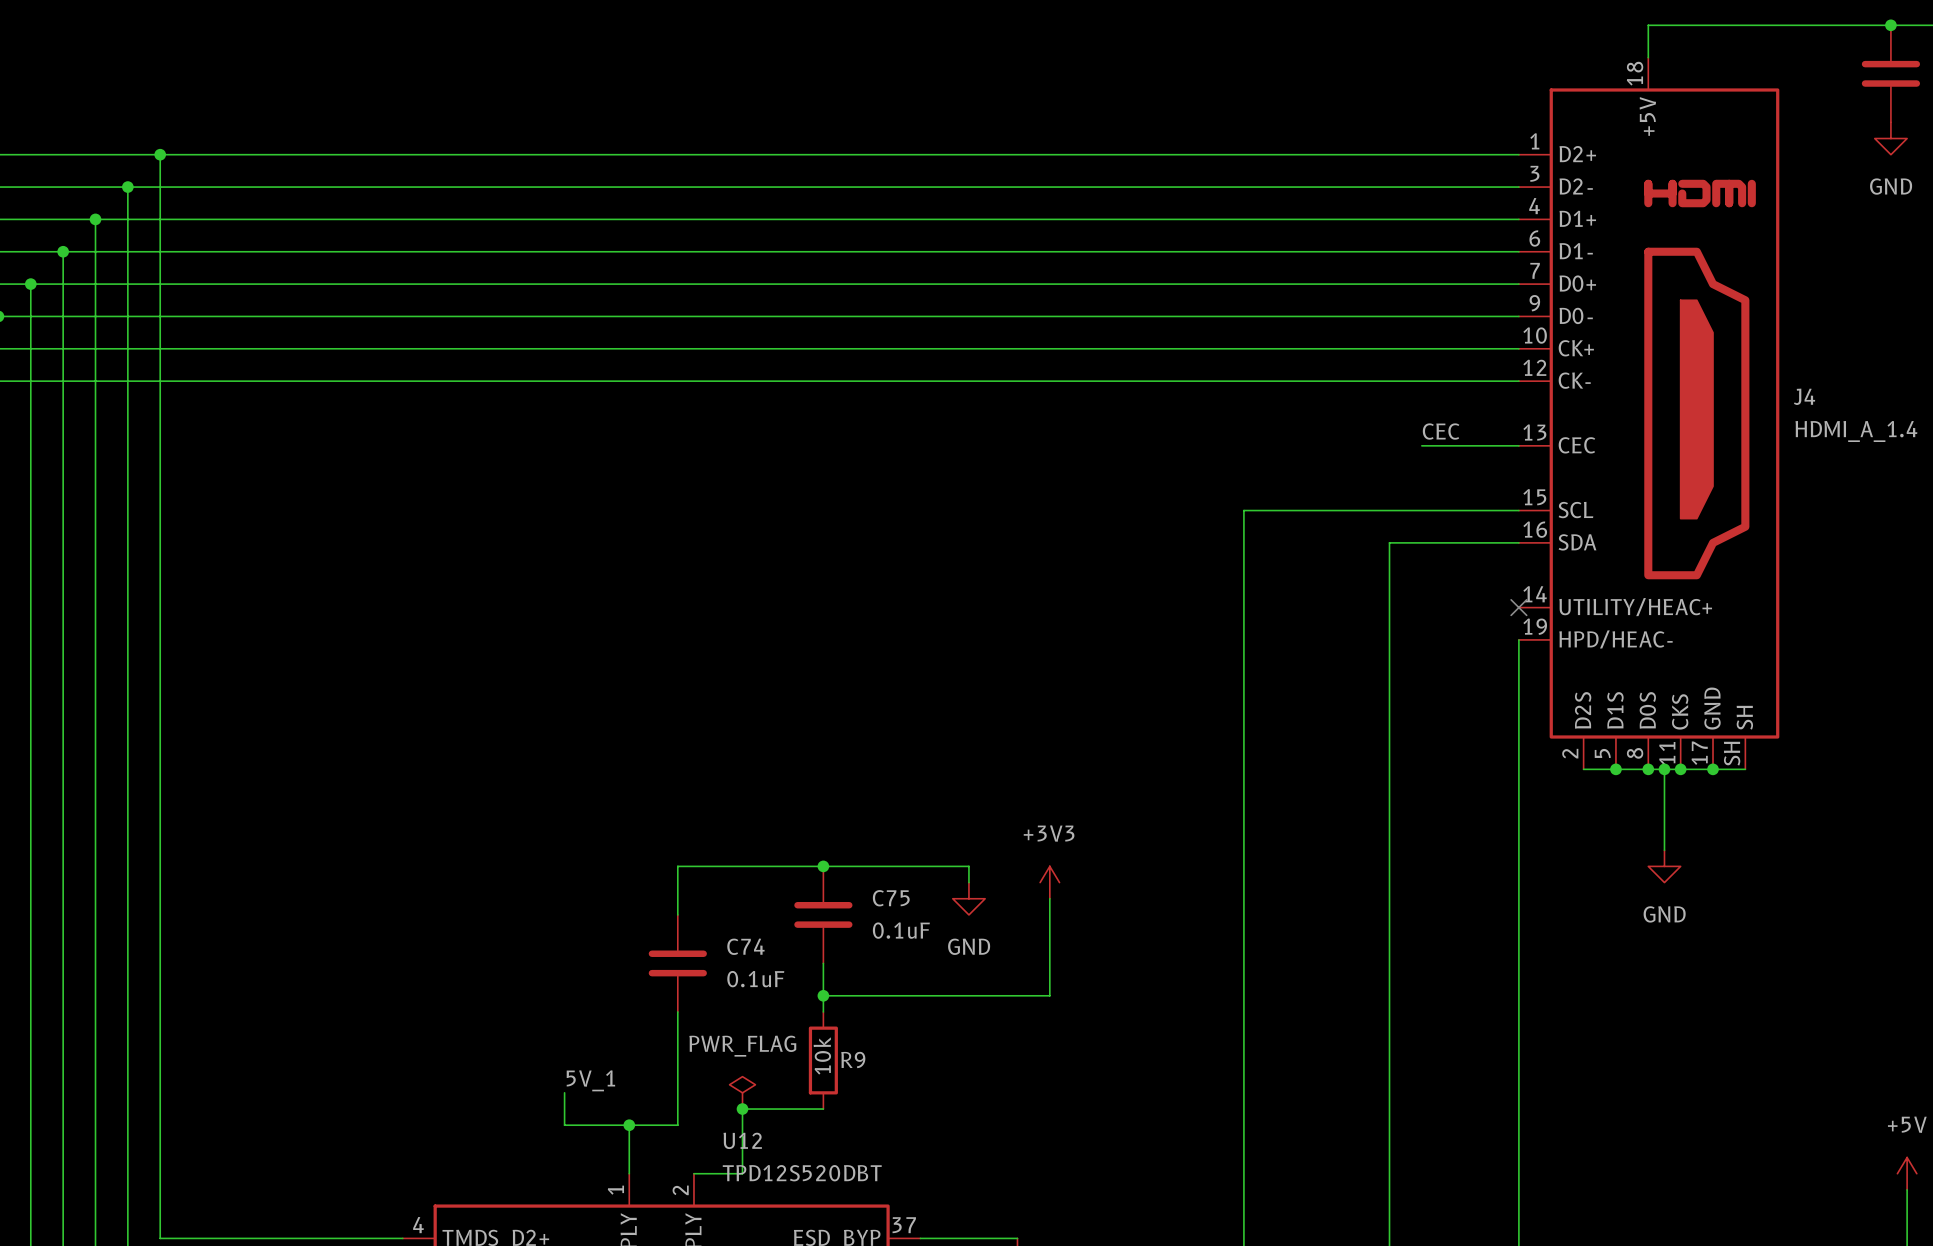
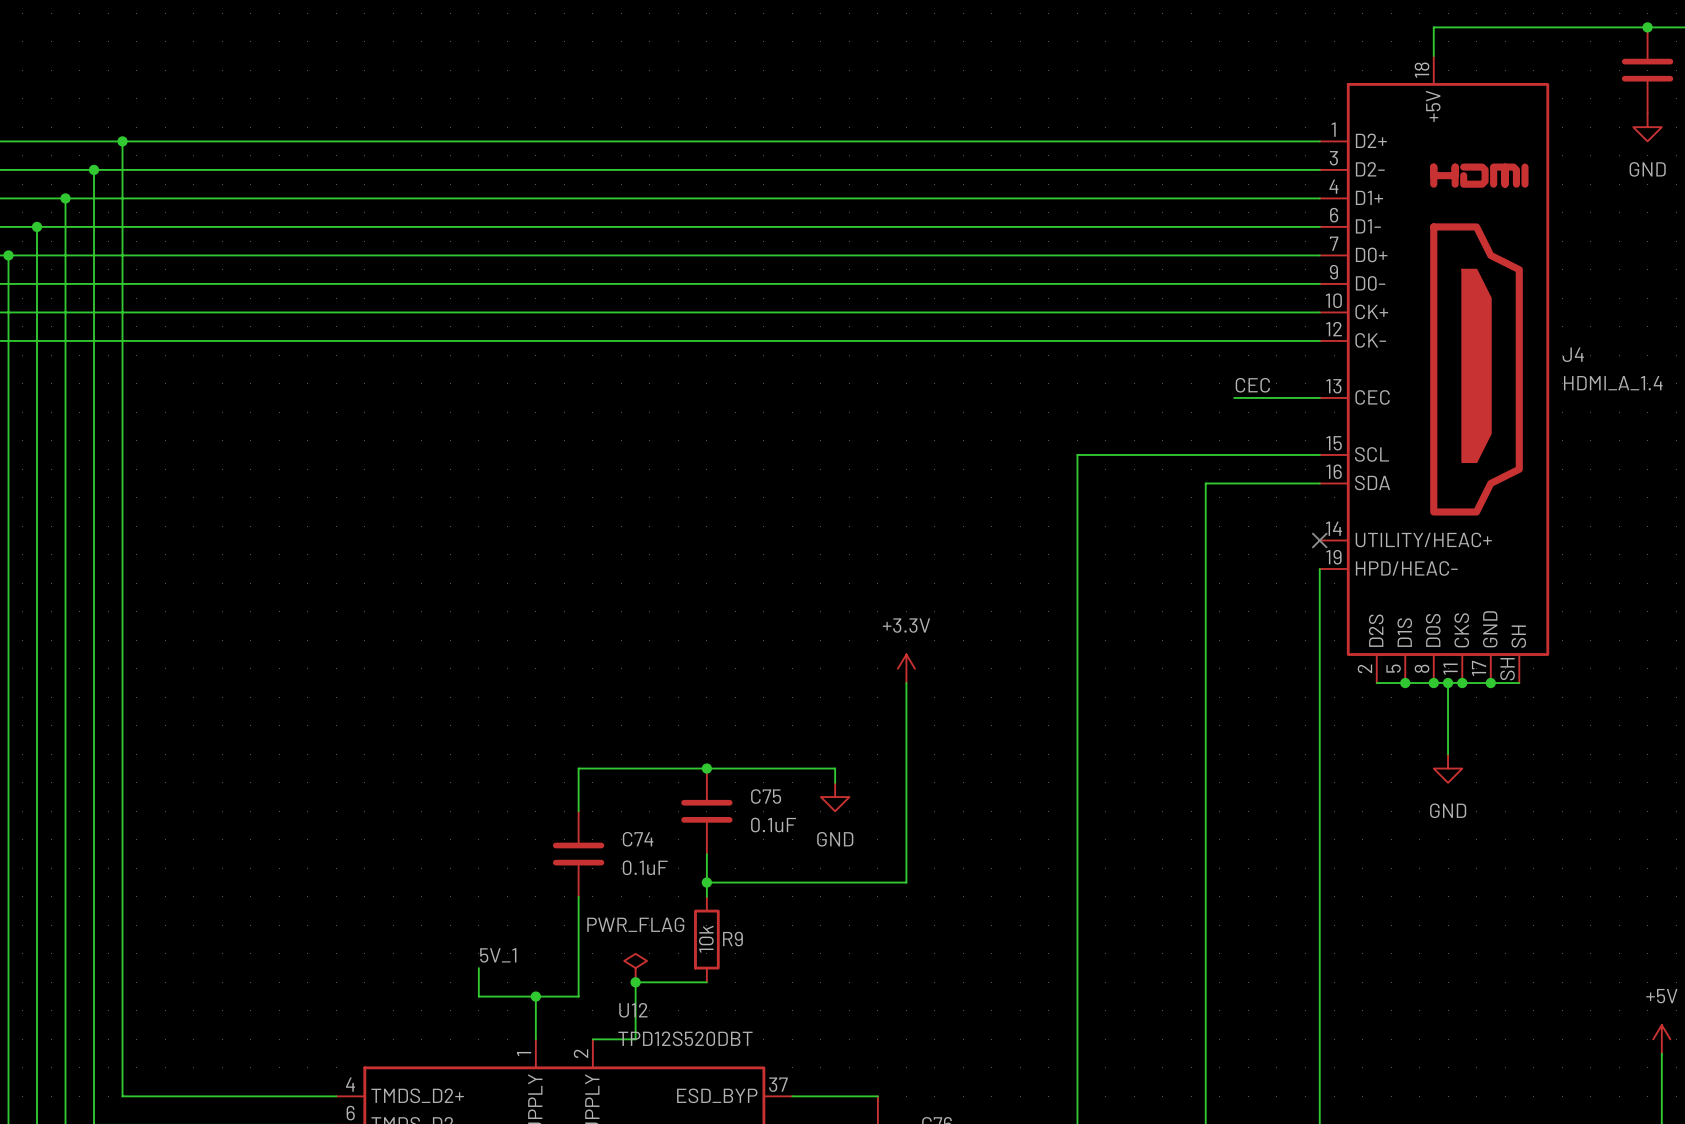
power symbol: none -> +3.3V (906, 668)
wire: none -> (906, 683) (906, 797)
power symbol: +3V3 (1049, 882) -> none

